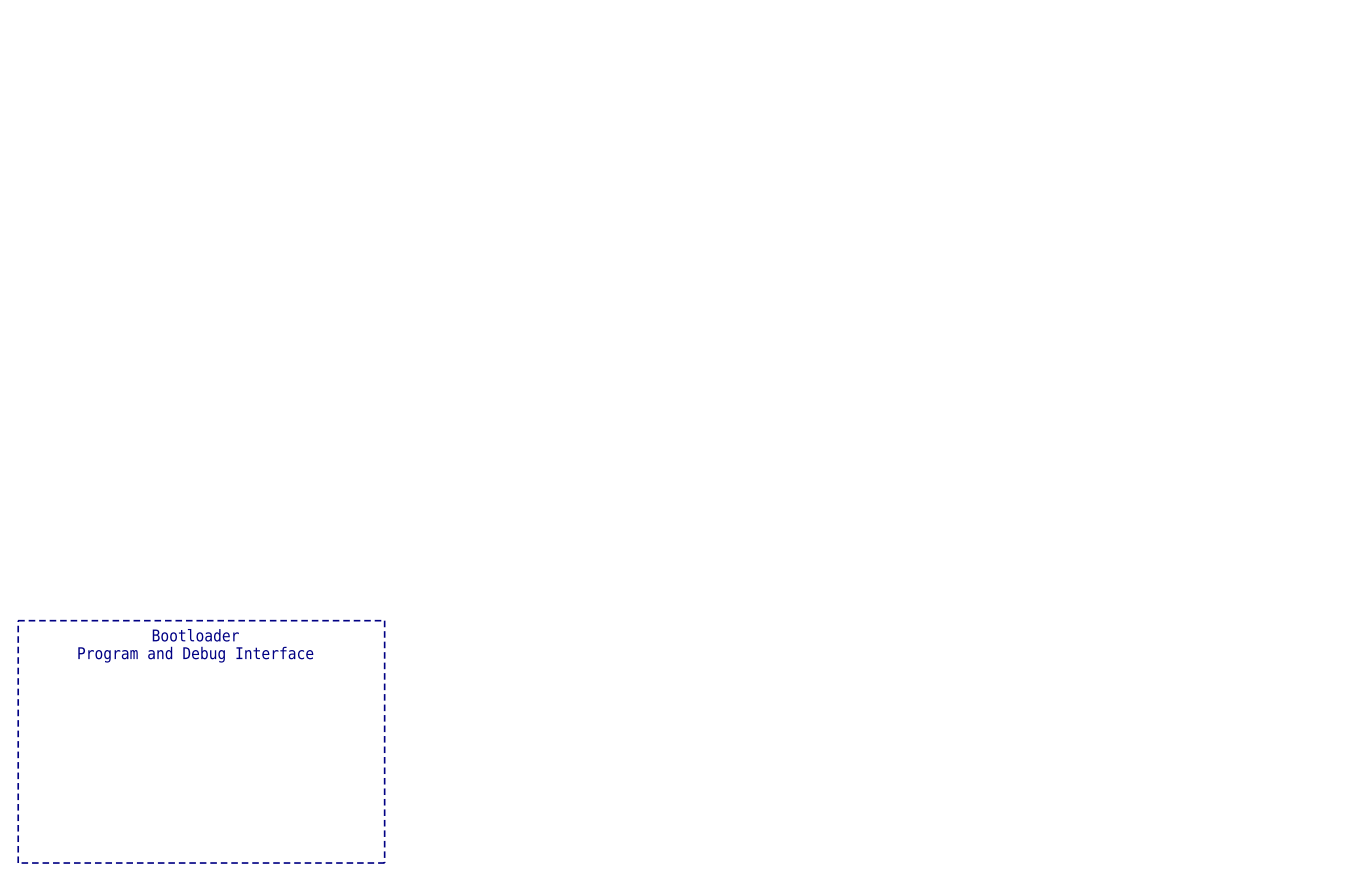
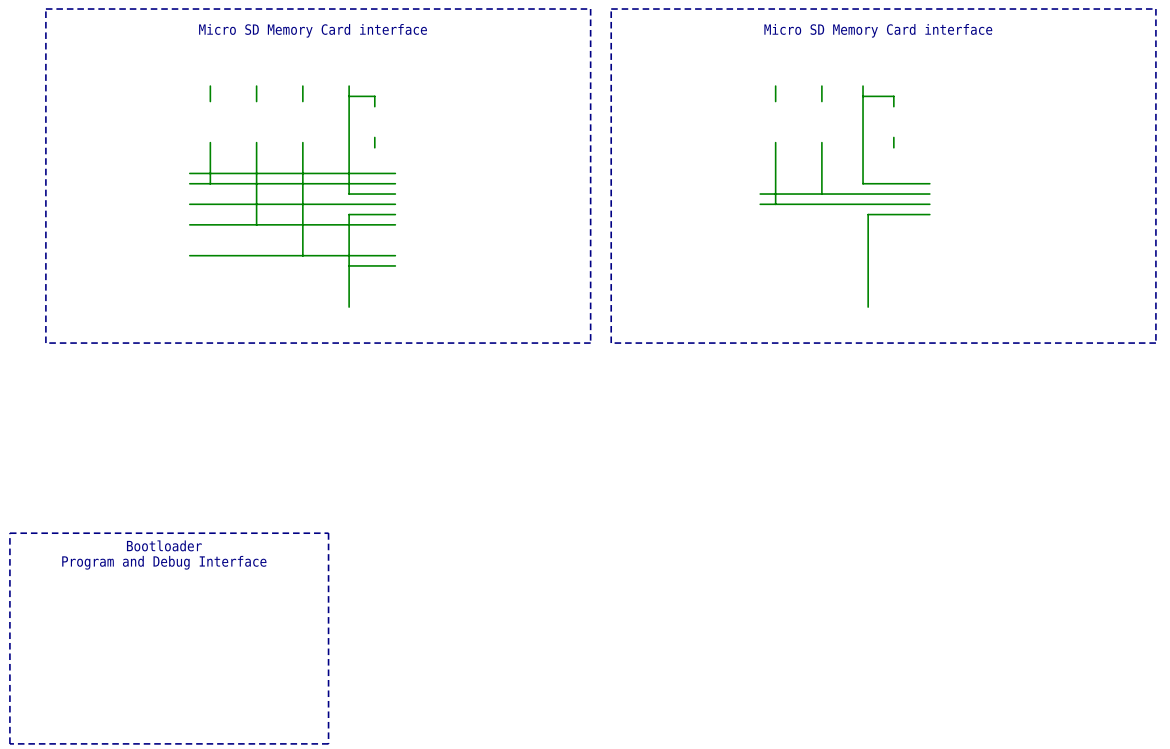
line: none -> (45, 9) (590, 9) (590, 343) (45, 343) (45, 9)
line: none -> (611, 9) (1155, 9) (1155, 343) (611, 343) (611, 9)
text: none -> Micro SD Memory Card interface (313, 30)
text: none -> Micro SD Memory Card interface (878, 30)
wire: none -> (210, 86) (210, 101)
wire: none -> (256, 86) (256, 101)
wire: none -> (302, 86) (302, 101)
wire: none -> (349, 86) (349, 194) (395, 194)
wire: none -> (775, 86) (775, 101)
wire: none -> (821, 86) (821, 101)
wire: none -> (863, 86) (863, 183) (929, 183)
wire: none -> (349, 96) (374, 96) (374, 106)
wire: none -> (863, 96) (893, 96) (893, 106)
wire: none -> (374, 137) (374, 147)
wire: none -> (893, 137) (893, 147)
wire: none -> (210, 142) (210, 183)
wire: none -> (256, 142) (256, 224)
wire: none -> (302, 142) (302, 255)
wire: none -> (775, 142) (775, 204)
wire: none -> (821, 142) (821, 194)
wire: none -> (189, 173) (395, 173)
wire: none -> (189, 183) (395, 183)
wire: none -> (760, 194) (929, 194)
wire: none -> (189, 204) (395, 204)
wire: none -> (760, 204) (929, 204)
wire: none -> (395, 214) (349, 214) (349, 307)
wire: none -> (929, 214) (868, 214) (868, 307)
wire: none -> (189, 224) (395, 224)
wire: none -> (189, 255) (395, 255)
wire: none -> (349, 265) (395, 265)

